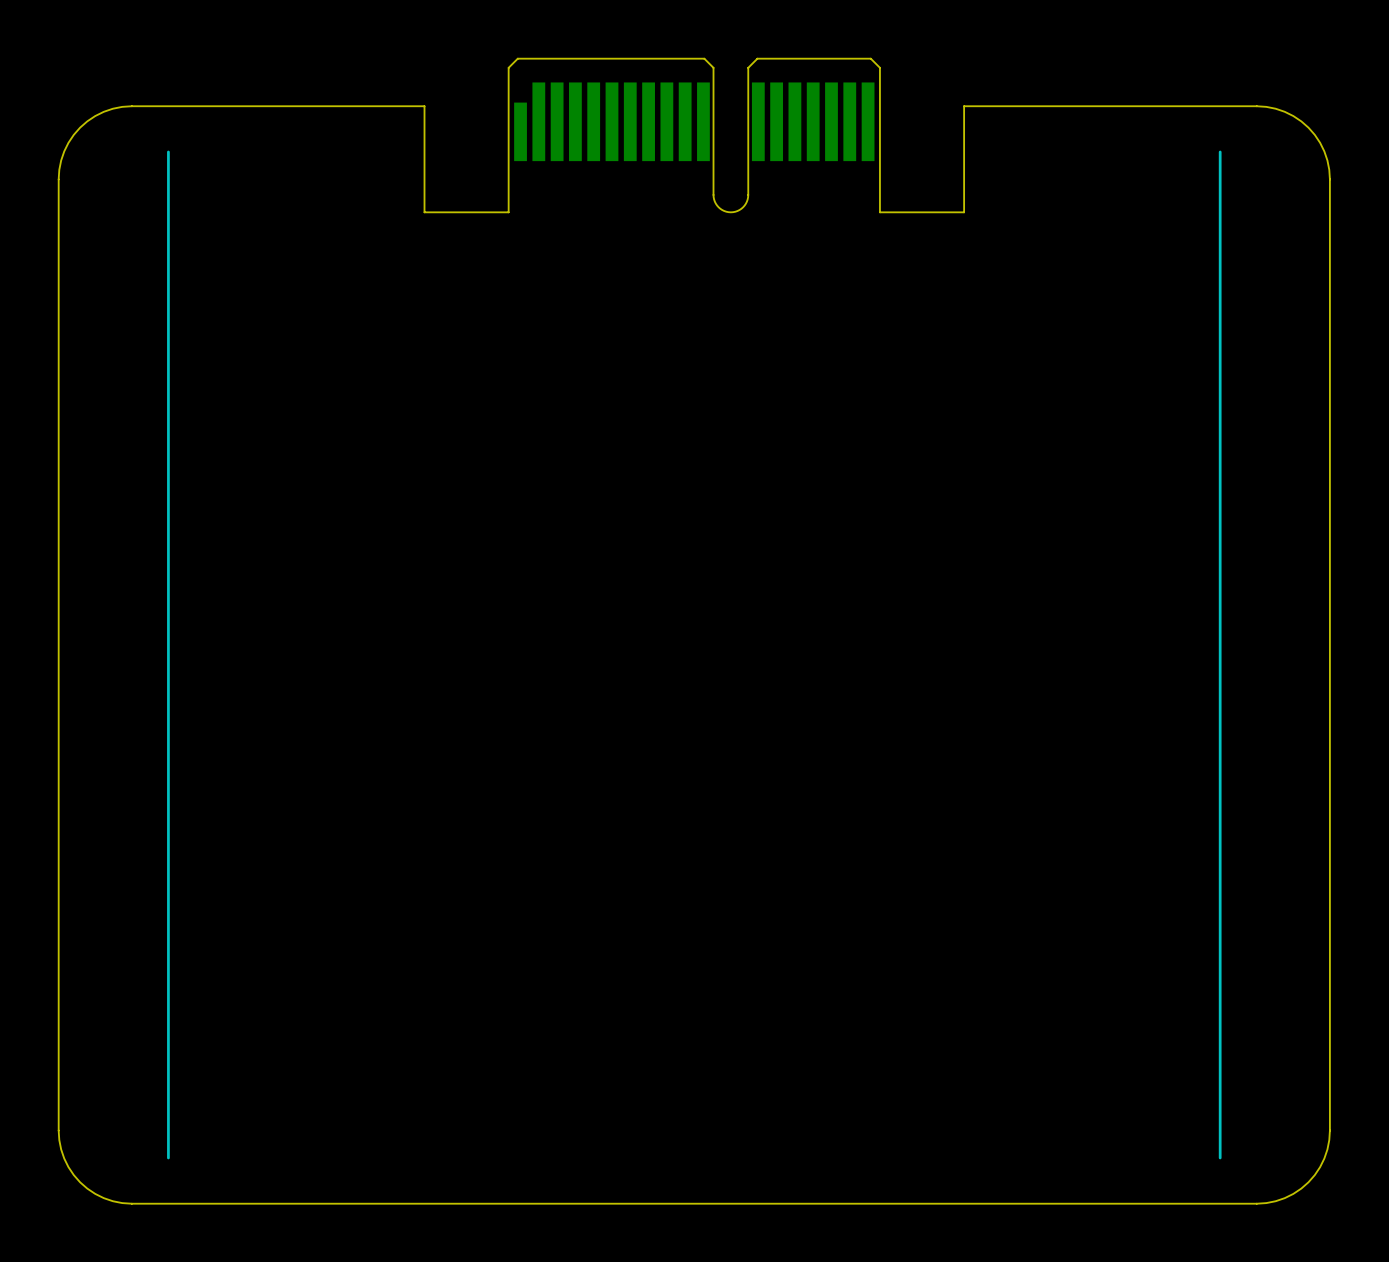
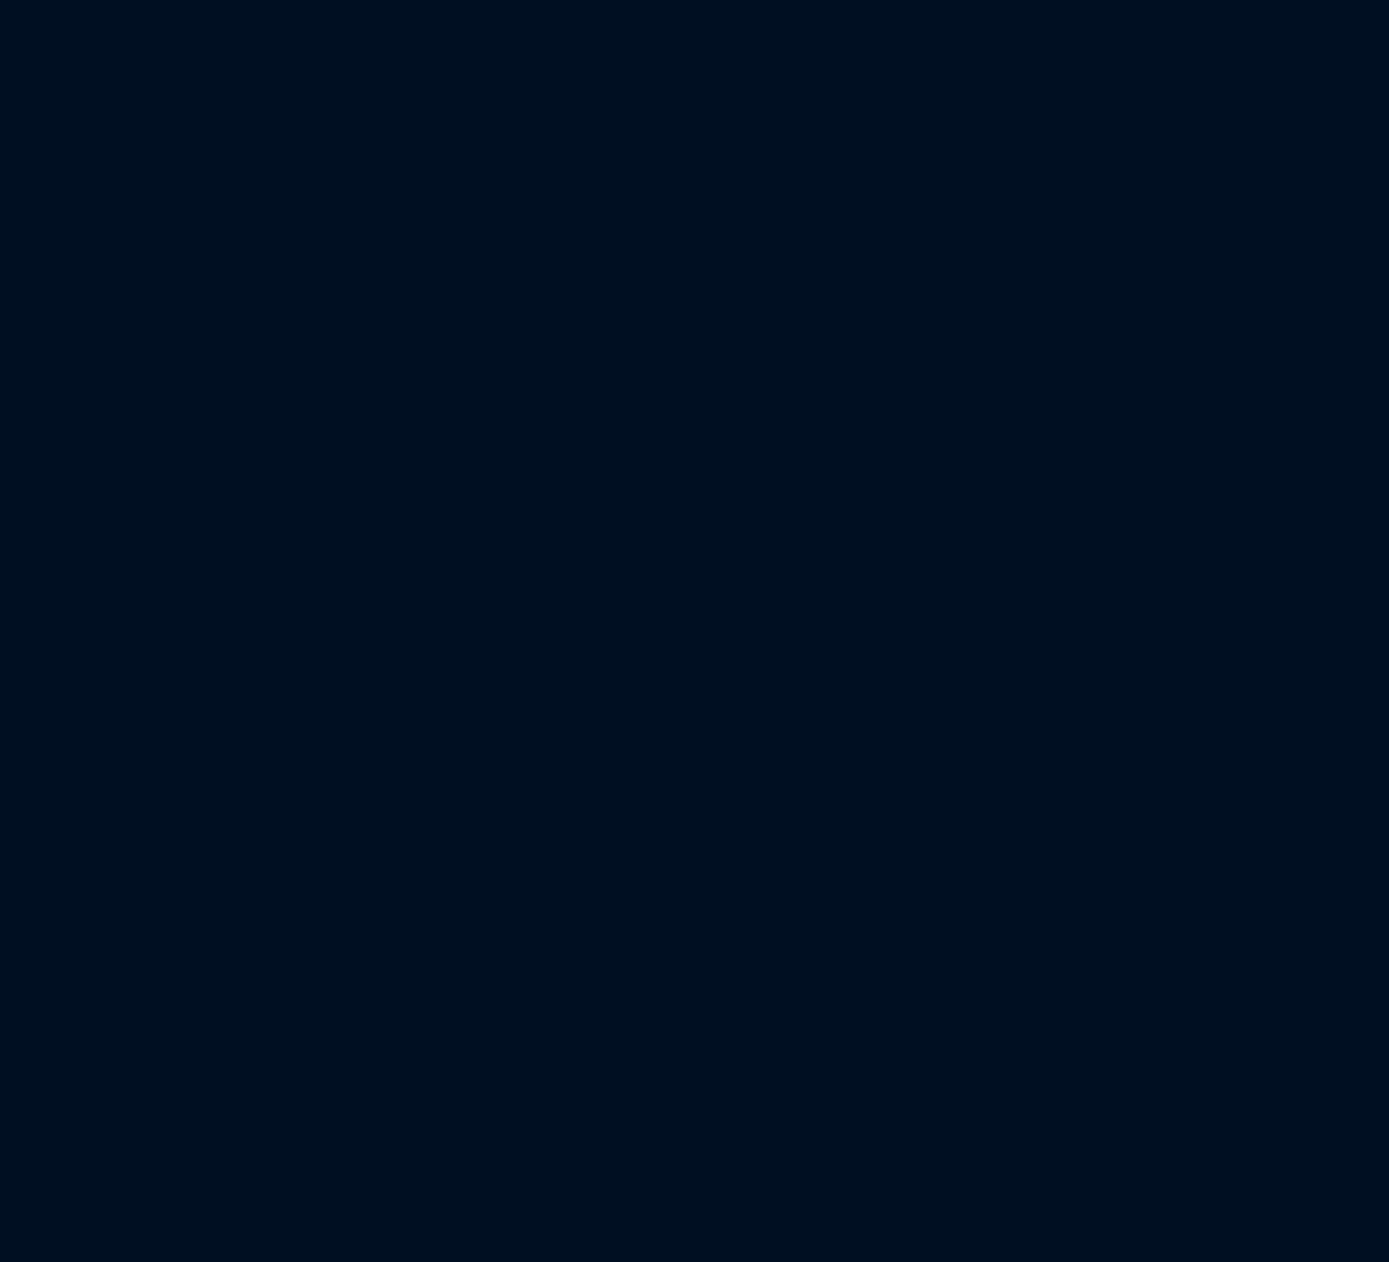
part: (694, 135) -> none
line: (168, 151) (168, 1157) -> none
line: (1220, 151) (1220, 1157) -> none
board edge: (879, 212) (964, 212) (964, 106) (1266, 106) (1284, 111) (1301, 121) (1314, 134) (1324, 151) (1329, 179) (1329, 1130) (1324, 1158) (1314, 1175) (1293, 1193) (1275, 1201) (1256, 1203) (131, 1203) (103, 1198) (80, 1182) (68, 1167) (61, 1149) (58, 1130) (58, 179) (64, 151) (73, 134) (87, 121) (103, 111) (122, 106) (424, 106) (424, 212) (508, 212) -> none

